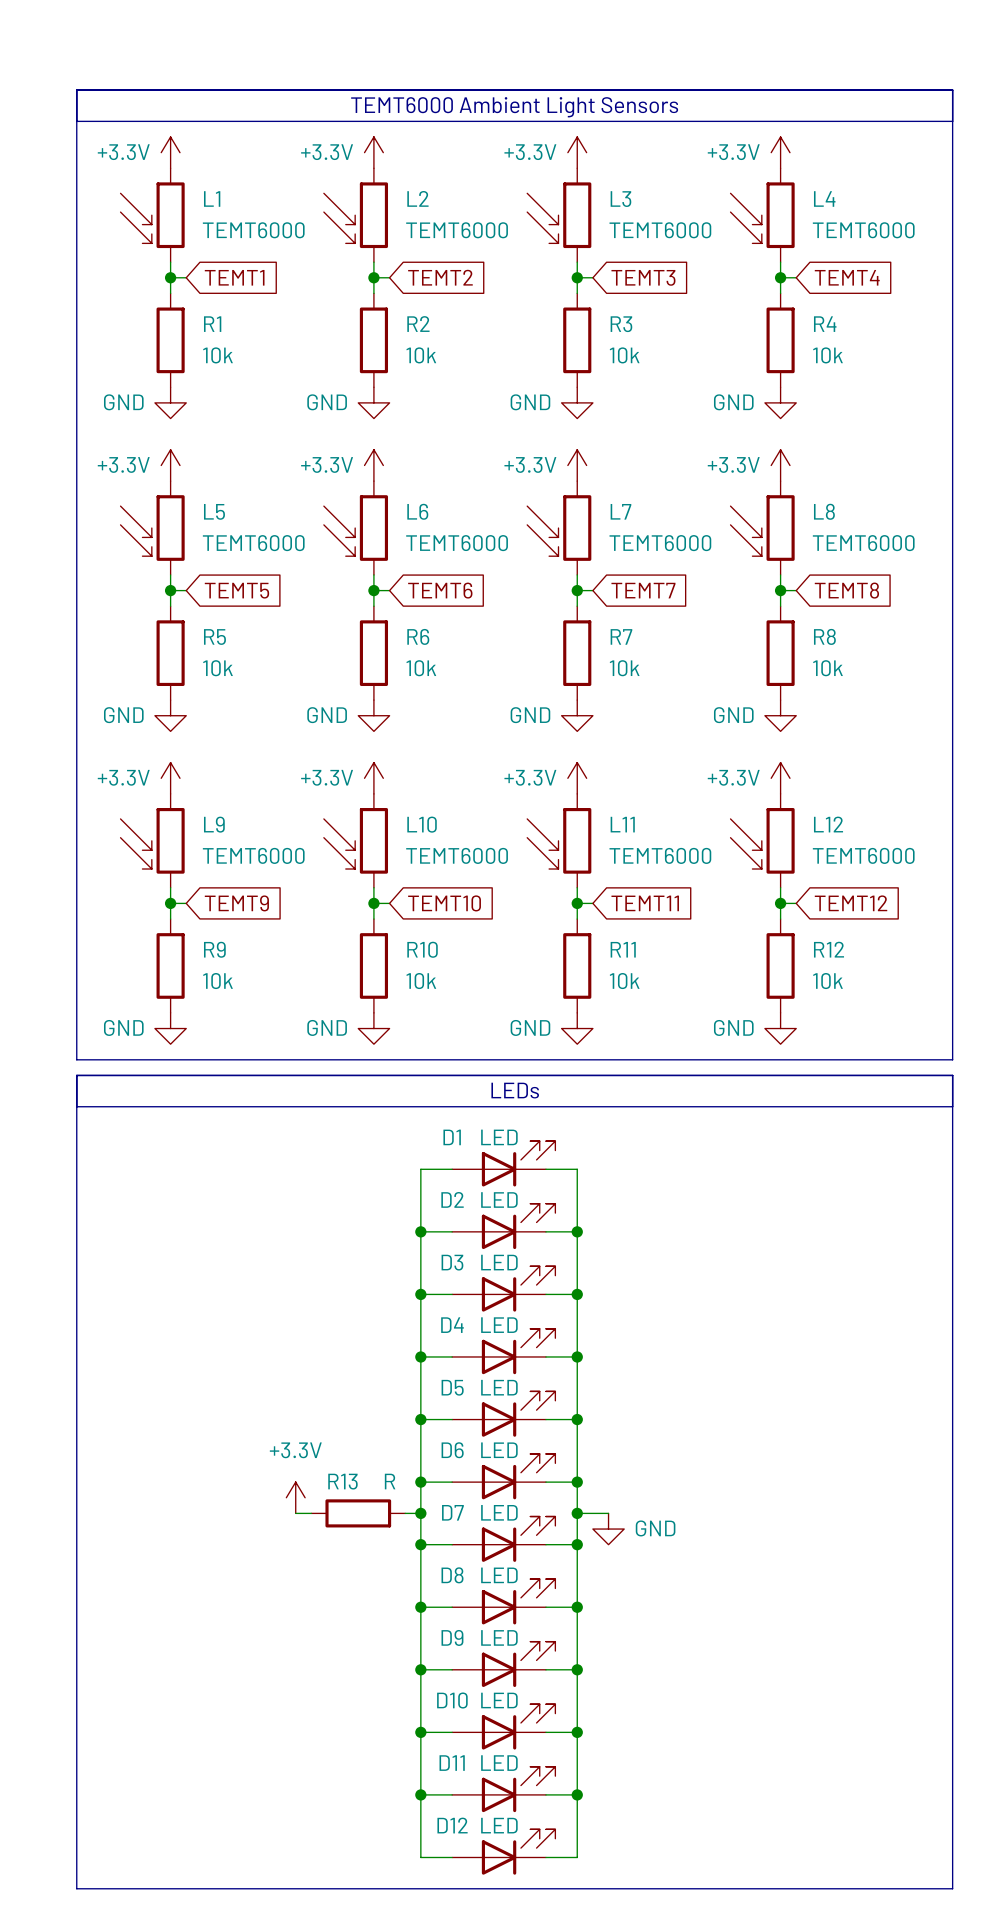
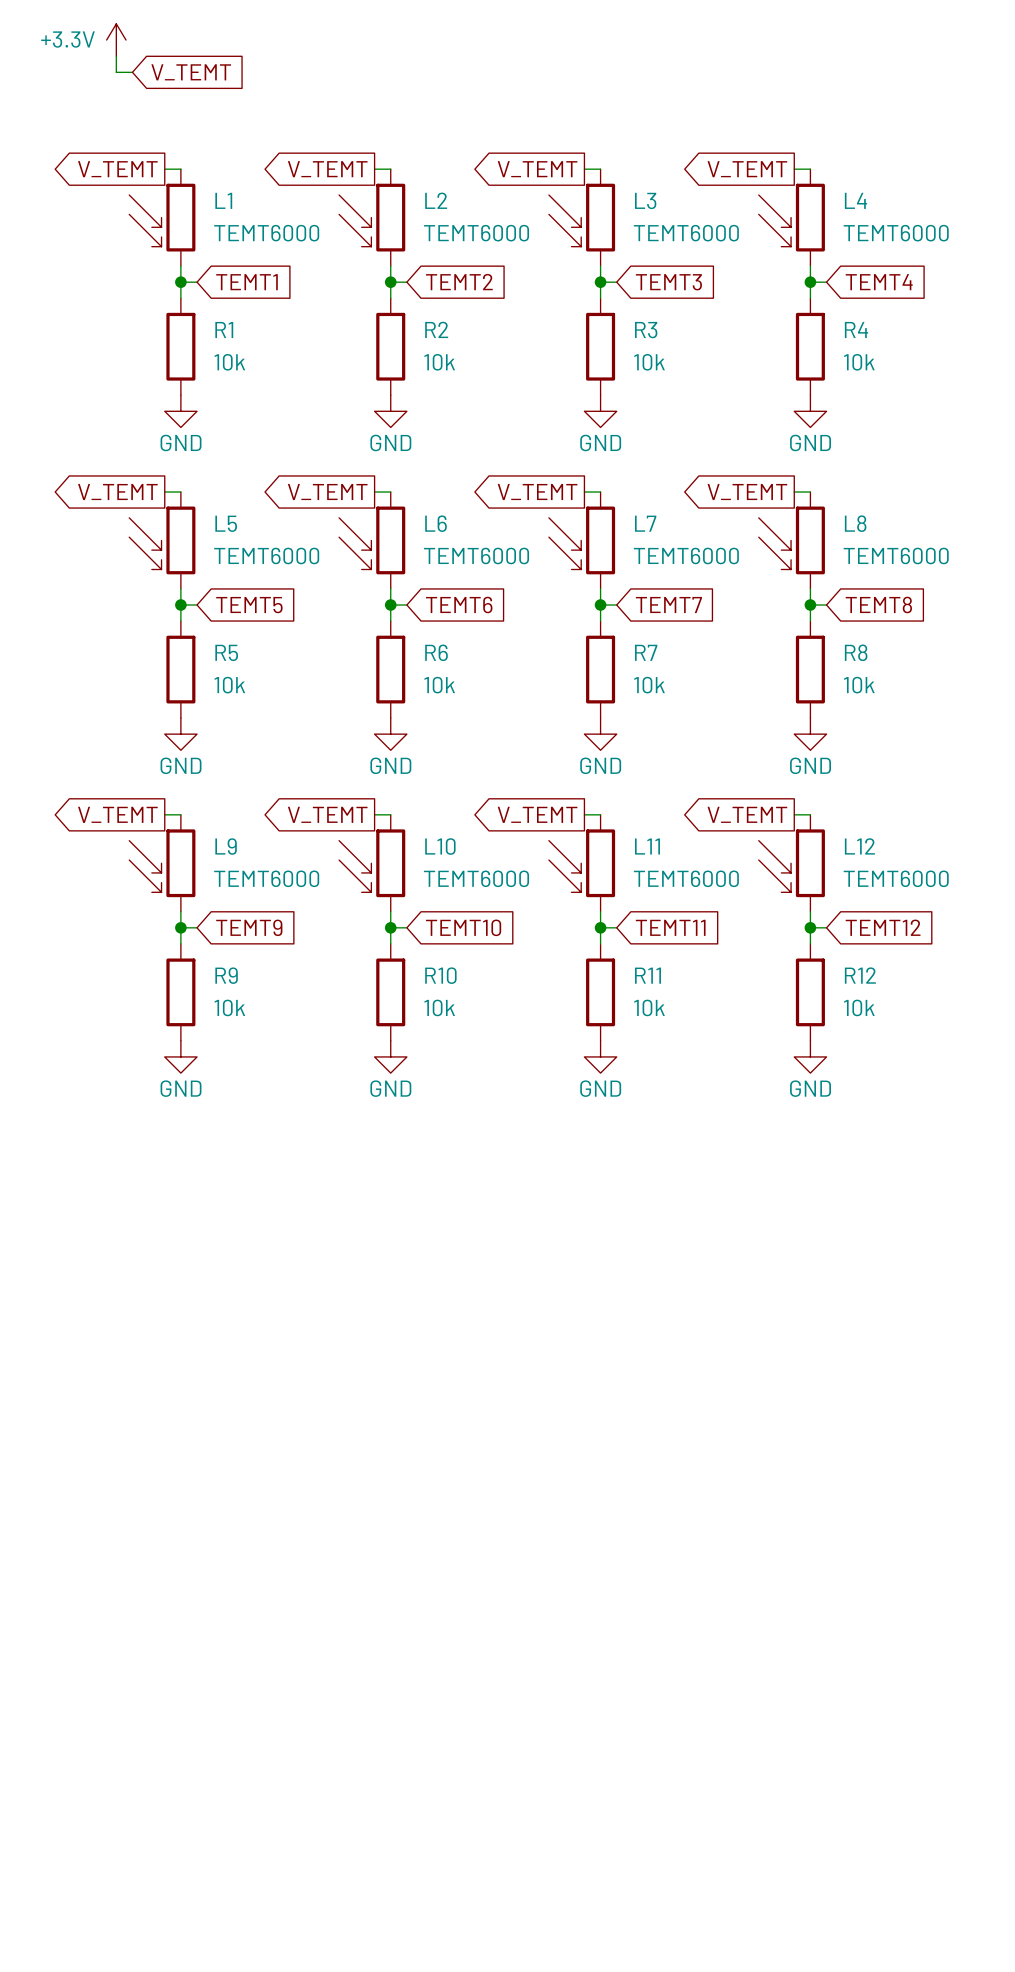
wire: none -> (116, 56) (116, 72) (132, 72)
global label: none -> V_TEMT (191, 72)
line: (76, 90) (76, 1059) (952, 1059) (952, 90) (76, 90) -> none
text: TEMT6000 Ambient Light Sensors (514, 107) -> none
line: (76, 121) (952, 121) -> none
power symbol position: +3.3V (170, 152) -> +3.3V (116, 40)
power symbol: +3.3V (373, 152) -> none
power symbol: +3.3V (577, 152) -> none
power symbol: +3.3V (780, 152) -> none
global label: none -> V_TEMT (117, 169)
wire: none -> (164, 169) (180, 169)
global label: none -> V_TEMT (327, 169)
wire: none -> (374, 169) (390, 169)
global label: none -> V_TEMT (537, 169)
wire: none -> (584, 169) (600, 169)
global label: none -> V_TEMT (747, 169)
wire: none -> (794, 169) (810, 169)
power symbol text position: GND (123, 402) -> GND (181, 442)
power symbol text position: GND (327, 402) -> GND (390, 442)
power symbol text position: GND (530, 402) -> GND (600, 442)
power symbol text position: GND (733, 402) -> GND (810, 442)
power symbol: +3.3V (170, 465) -> none
power symbol: +3.3V (373, 465) -> none
power symbol: +3.3V (577, 465) -> none
power symbol: +3.3V (780, 465) -> none
global label: none -> V_TEMT (117, 492)
wire: none -> (164, 492) (180, 492)
global label: none -> V_TEMT (327, 492)
wire: none -> (374, 492) (390, 492)
global label: none -> V_TEMT (537, 492)
wire: none -> (584, 492) (600, 492)
global label: none -> V_TEMT (747, 492)
wire: none -> (794, 492) (810, 492)
power symbol text position: GND (123, 715) -> GND (181, 765)
power symbol text position: GND (327, 715) -> GND (390, 765)
power symbol text position: GND (530, 715) -> GND (600, 765)
power symbol text position: GND (733, 715) -> GND (810, 765)
power symbol: +3.3V (170, 778) -> none
power symbol: +3.3V (373, 778) -> none
power symbol: +3.3V (577, 778) -> none
power symbol: +3.3V (780, 778) -> none
global label: none -> V_TEMT (117, 814)
wire: none -> (164, 814) (180, 814)
global label: none -> V_TEMT (327, 814)
wire: none -> (374, 814) (390, 814)
global label: none -> V_TEMT (537, 814)
wire: none -> (584, 814) (600, 814)
global label: none -> V_TEMT (747, 814)
wire: none -> (794, 814) (810, 814)
power symbol text position: GND (123, 1027) -> GND (181, 1088)
power symbol text position: GND (327, 1027) -> GND (390, 1088)
power symbol text position: GND (530, 1027) -> GND (600, 1088)
power symbol text position: GND (733, 1027) -> GND (810, 1088)
line: (76, 1075) (952, 1075) (952, 1888) (76, 1888) (76, 1075) -> none
text: LEDs (515, 1090) -> none
line: (76, 1106) (952, 1106) -> none
D1: LED (503, 1163) -> none
wire: (452, 1169) (420, 1169) (420, 1857) (452, 1857) -> none
wire: (545, 1169) (577, 1169) (577, 1857) (545, 1857) -> none
D2: LED (503, 1226) -> none
wire: (420, 1231) (452, 1231) -> none
junction: (420, 1231) -> none
wire: (545, 1231) (577, 1231) -> none
junction: (577, 1231) -> none
D3: LED (503, 1288) -> none
wire: (420, 1294) (452, 1294) -> none
junction: (420, 1294) -> none
wire: (545, 1294) (577, 1294) -> none
junction: (577, 1294) -> none
D4: LED (503, 1351) -> none
wire: (420, 1356) (452, 1356) -> none
junction: (420, 1356) -> none
wire: (545, 1356) (577, 1356) -> none
junction: (577, 1356) -> none
D5: LED (503, 1414) -> none
wire: (420, 1419) (452, 1419) -> none
junction: (420, 1419) -> none
wire: (545, 1419) (577, 1419) -> none
junction: (577, 1419) -> none
D6: LED (503, 1476) -> none
wire: (420, 1482) (452, 1482) -> none
junction: (420, 1482) -> none
wire: (545, 1482) (577, 1482) -> none
junction: (577, 1482) -> none
power symbol: +3.3V (295, 1497) -> none
wire: (295, 1513) (311, 1513) -> none
R13: R (358, 1513) -> none
wire: (405, 1513) (420, 1513) -> none
junction: (420, 1513) -> none
wire: (577, 1513) (608, 1513) -> none
junction: (577, 1513) -> none
power symbol: GND (608, 1529) -> none
D7: LED (503, 1539) -> none
wire: (420, 1544) (452, 1544) -> none
junction: (420, 1544) -> none
wire: (545, 1544) (577, 1544) -> none
junction: (577, 1544) -> none
D8: LED (503, 1601) -> none
wire: (420, 1607) (452, 1607) -> none
junction: (420, 1607) -> none
wire: (545, 1607) (577, 1607) -> none
junction: (577, 1607) -> none
D9: LED (503, 1664) -> none
wire: (420, 1669) (452, 1669) -> none
junction: (420, 1669) -> none
wire: (545, 1669) (577, 1669) -> none
junction: (577, 1669) -> none
D10: LED (503, 1726) -> none
wire: (420, 1732) (452, 1732) -> none
junction: (420, 1732) -> none
wire: (545, 1732) (577, 1732) -> none
junction: (577, 1732) -> none
D11: LED (503, 1789) -> none
wire: (420, 1794) (452, 1794) -> none
junction: (420, 1794) -> none
wire: (545, 1794) (577, 1794) -> none
junction: (577, 1794) -> none
D12: LED (503, 1852) -> none

